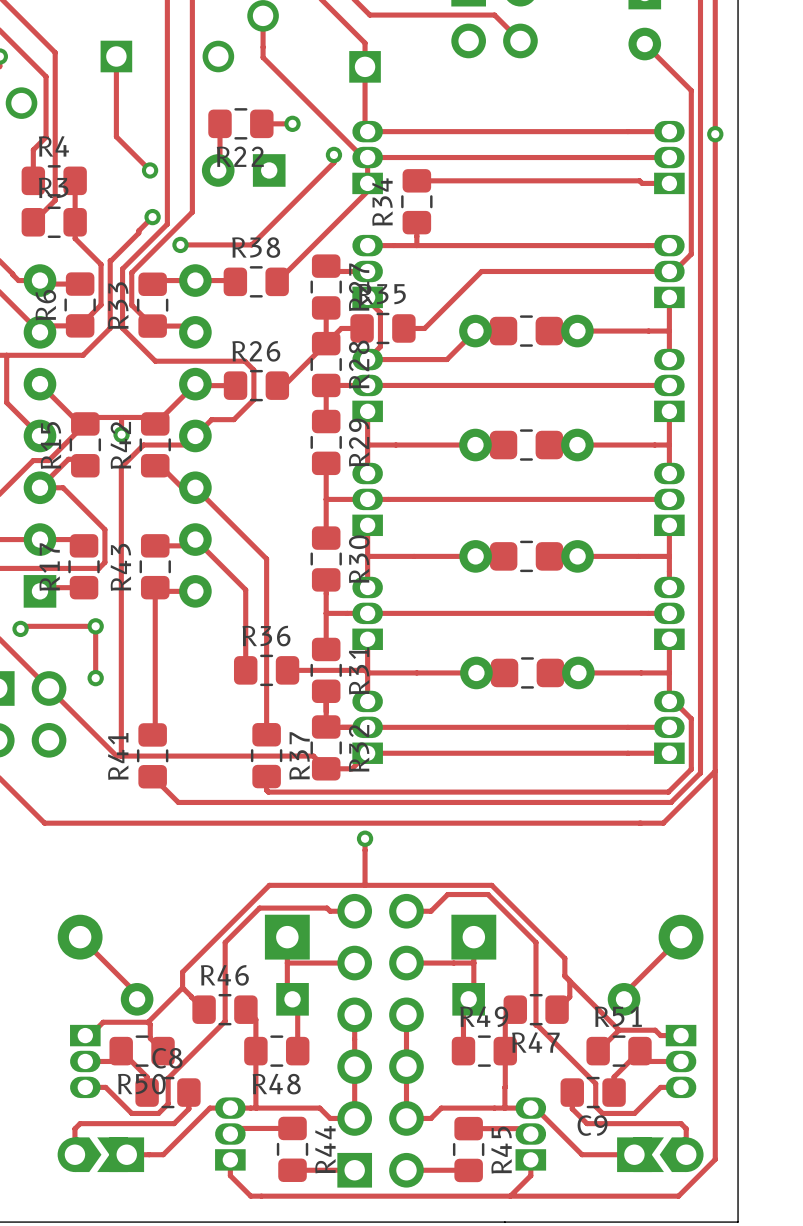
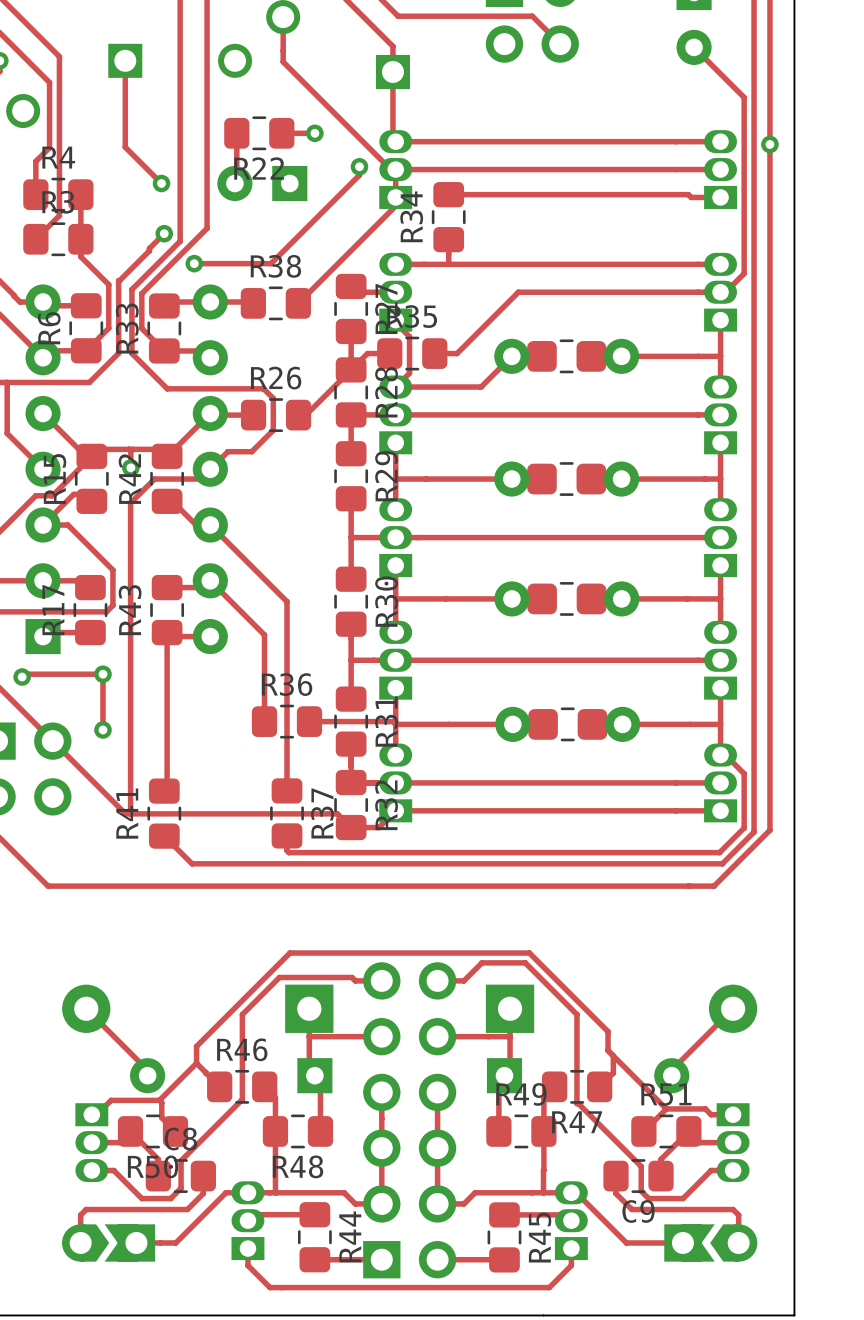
track: (715, 771) (715, 1159) (678, 1196) (510, 1196) -> none
track: (365, 838) (365, 885) -> none
via: (365, 838) -> none

